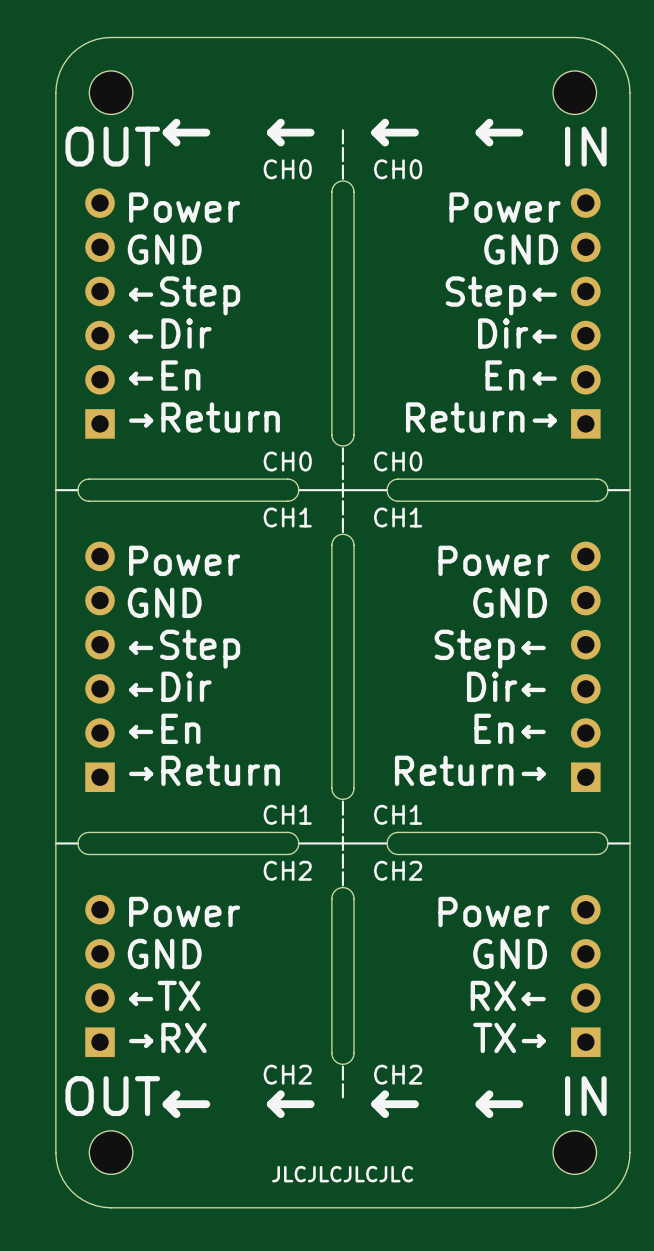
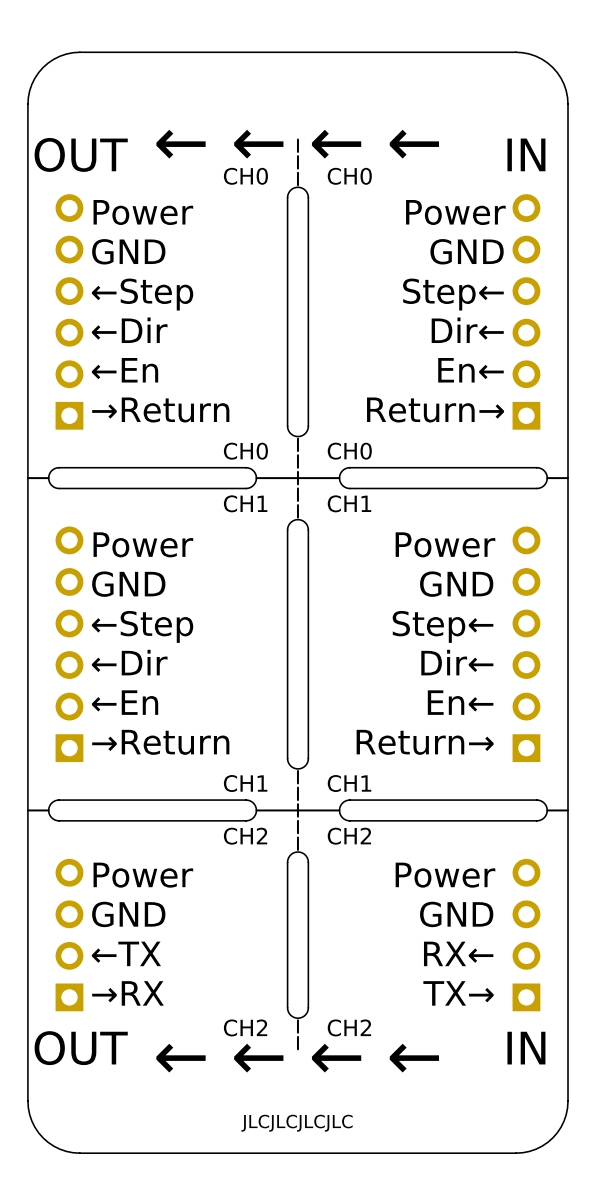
part: (111, 92) -> none
part: (574, 92) -> none
part: (111, 1152) -> none
part: (574, 1152) -> none

